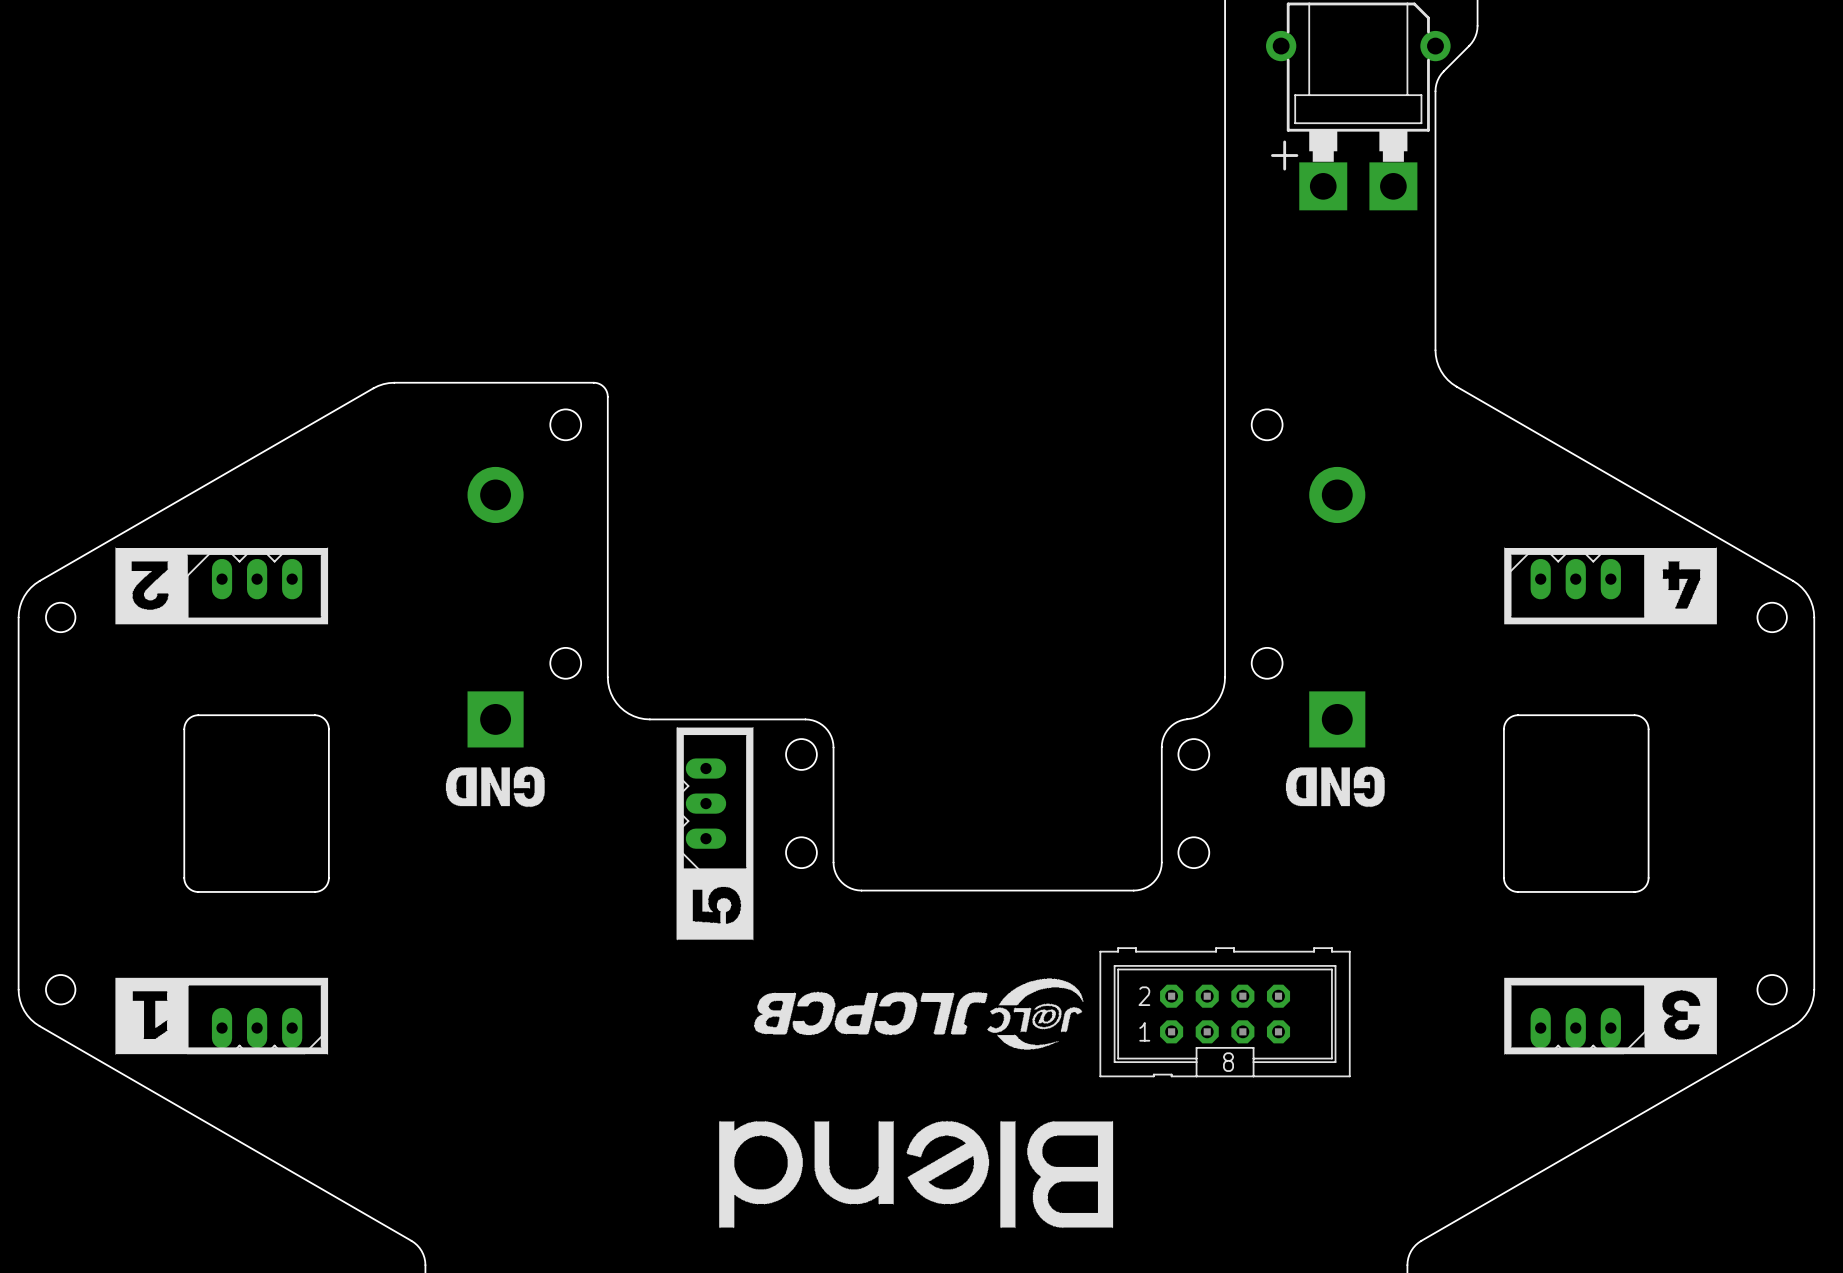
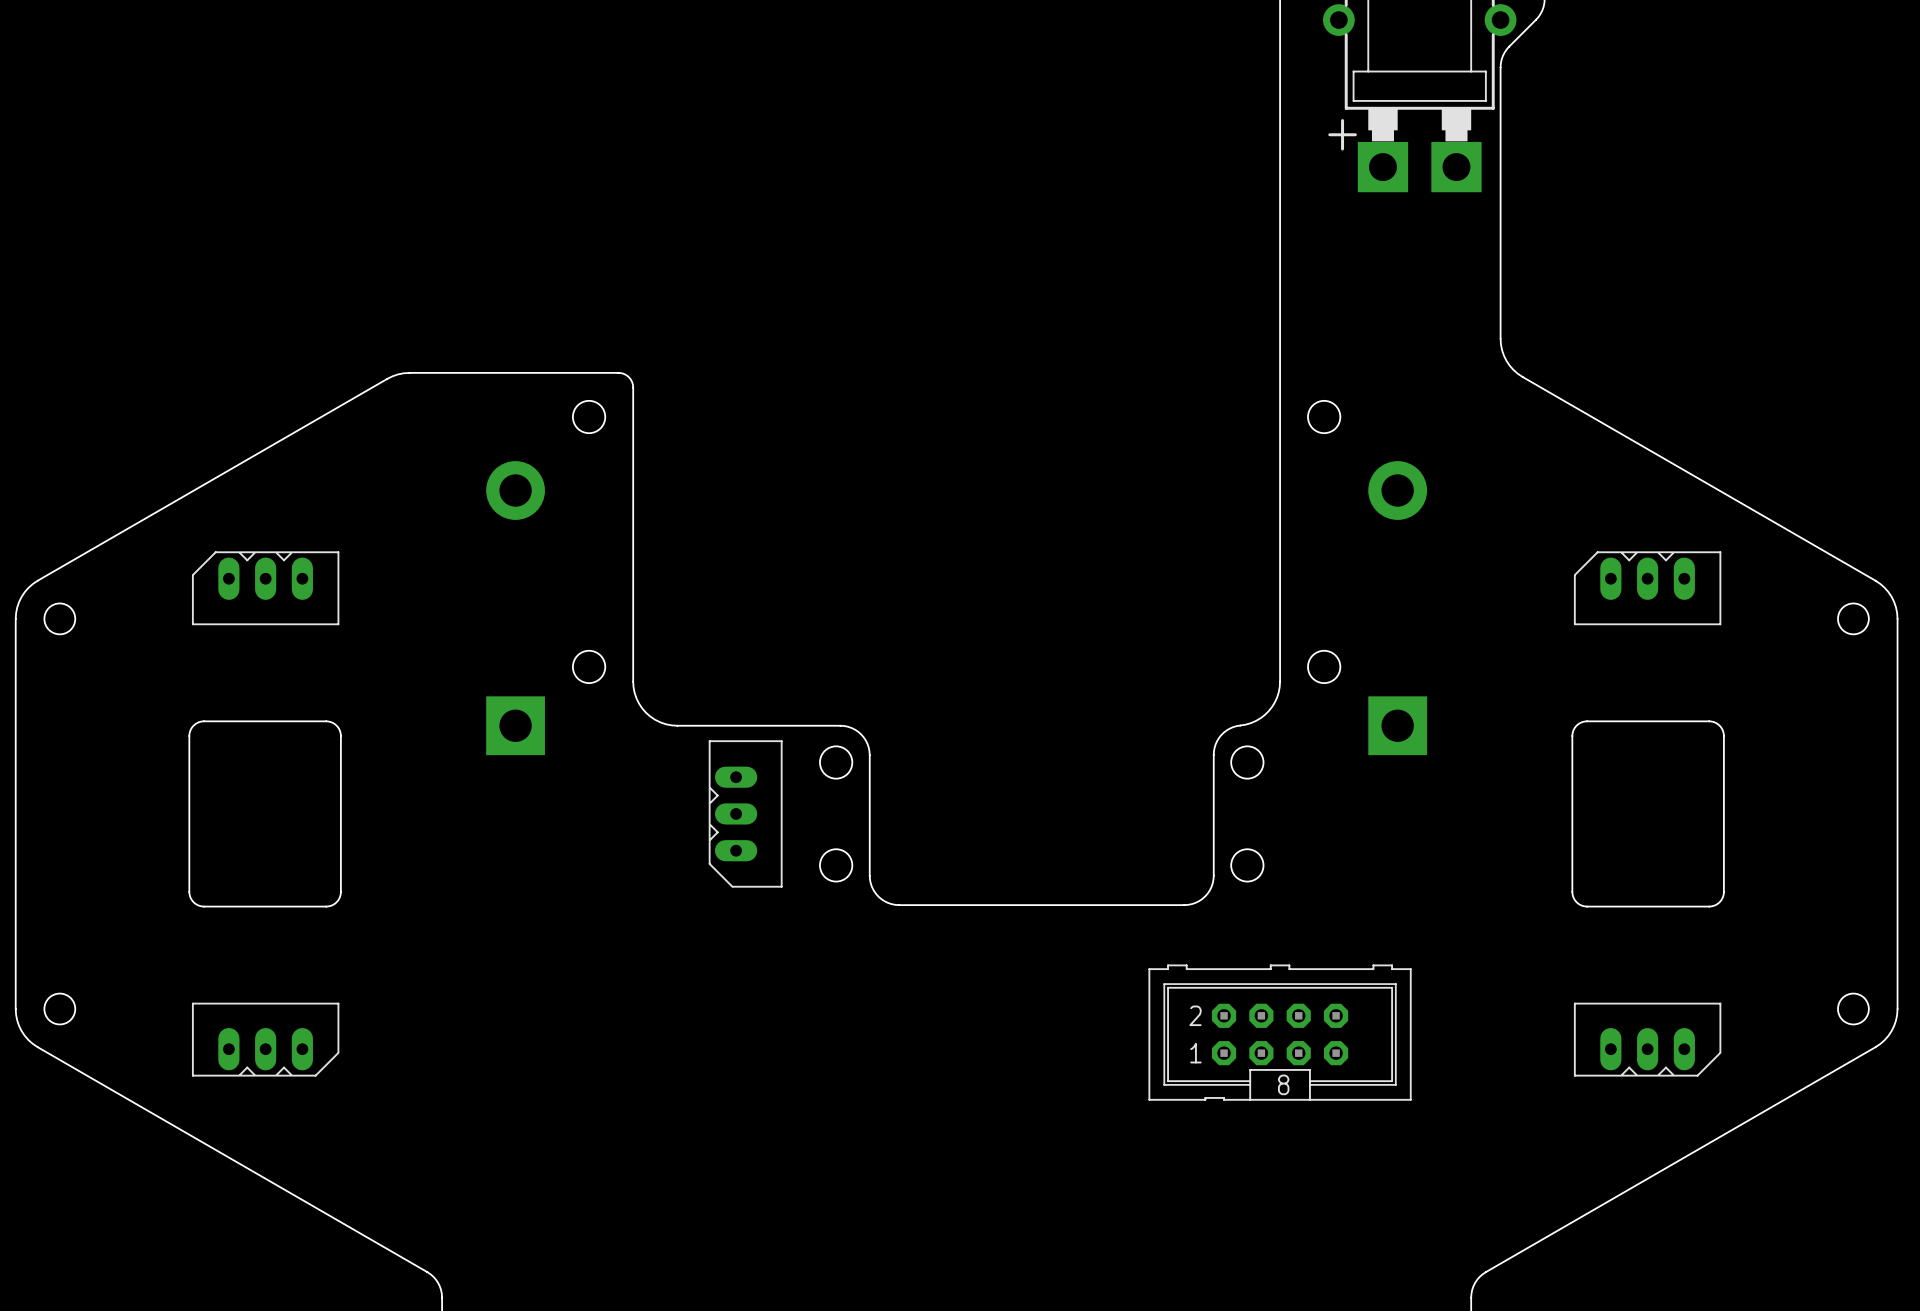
drawing: [115, 547, 329, 625] -> none
drawing: [1504, 547, 1717, 625] -> none
drawing: [676, 727, 754, 941] -> none
drawing: [445, 766, 545, 808] -> none
drawing: [1285, 766, 1385, 808] -> none
drawing: [115, 977, 329, 1055] -> none
drawing: [1504, 977, 1717, 1055] -> none
drawing: [753, 978, 1084, 1050] -> none
drawing: [719, 1120, 1114, 1229] -> none

